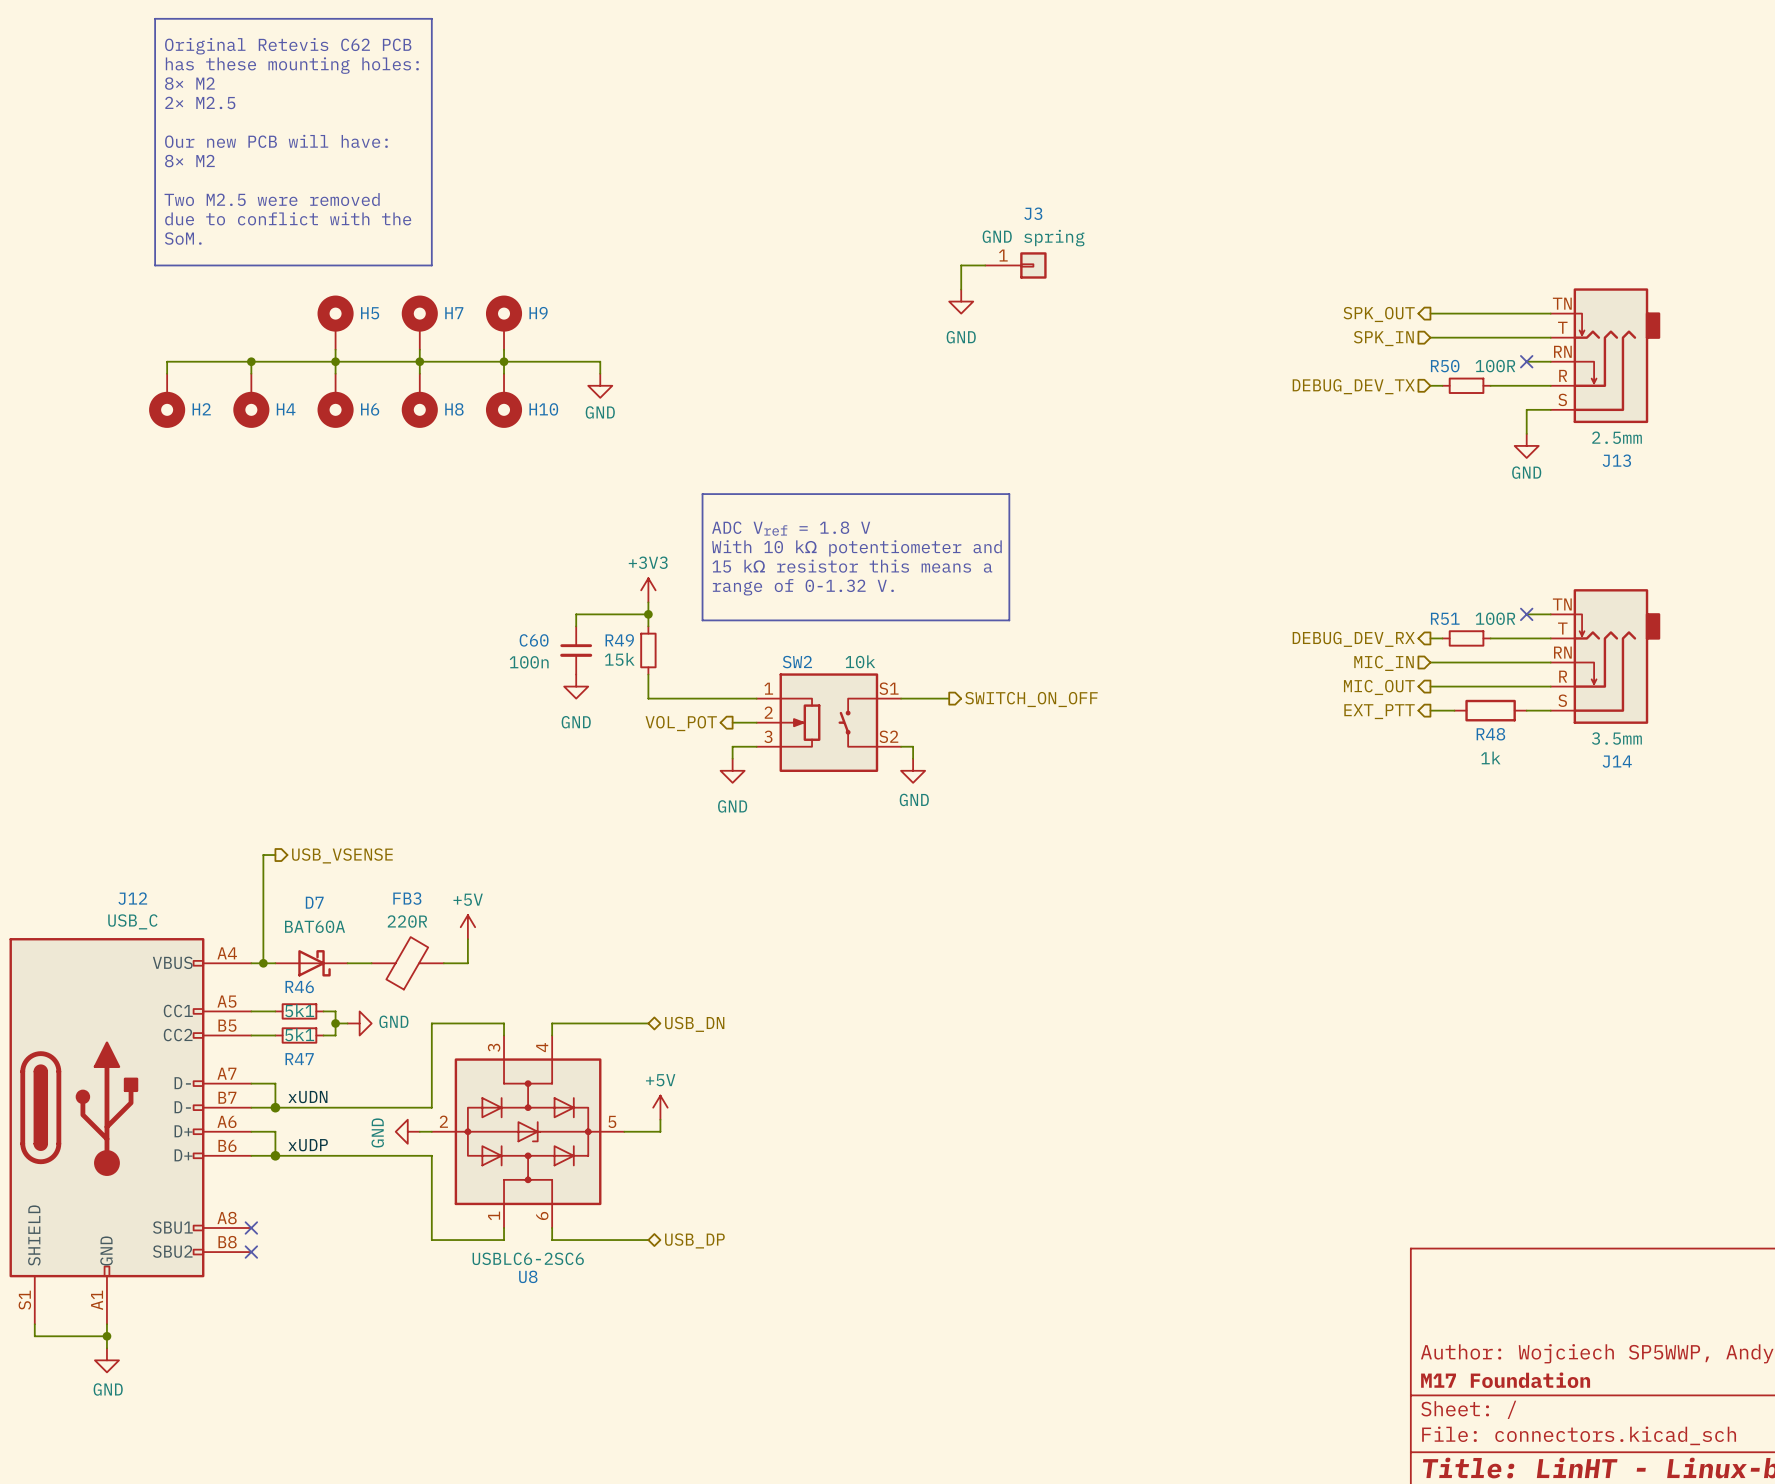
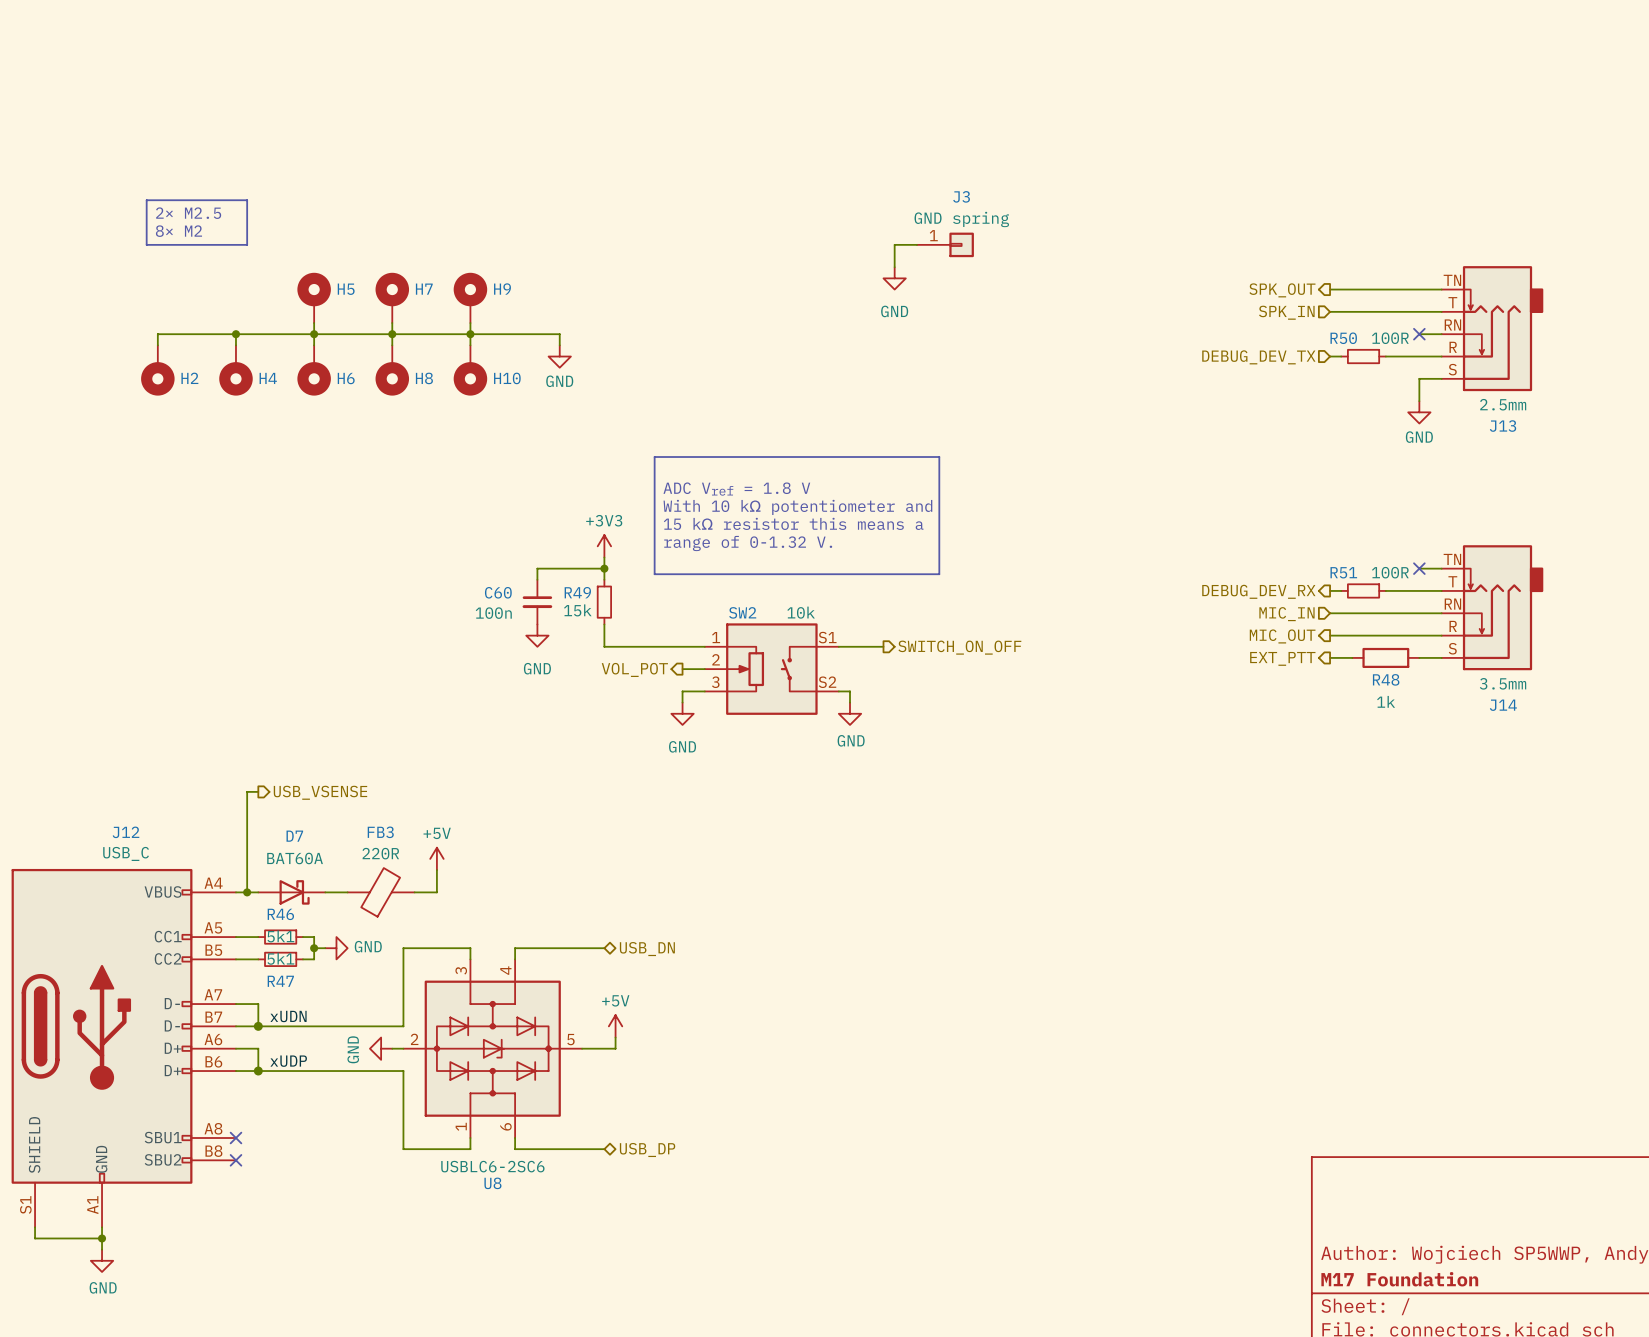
text: Original Retevis C62 PCB (288, 46) -> none
text: has these mounting holes: (292, 65) -> none
text: 8× M2 (189, 83) -> none
text position: 2× M2.5 (200, 102) -> 2× M2.5 (188, 213)
text: Our new PCB will have: (276, 141) -> none
text: 8× M2 (189, 161) -> none
text: Two M2.5 were removed (272, 199) -> none
line: (155, 217) (155, 18) (431, 18) (431, 265) (263, 265) -> (146, 200) (247, 200) (247, 244)
text: due to conflict with the (288, 218) -> none
text: SoM. (183, 238) -> none
text: none -> 8× M2 (178, 231)

